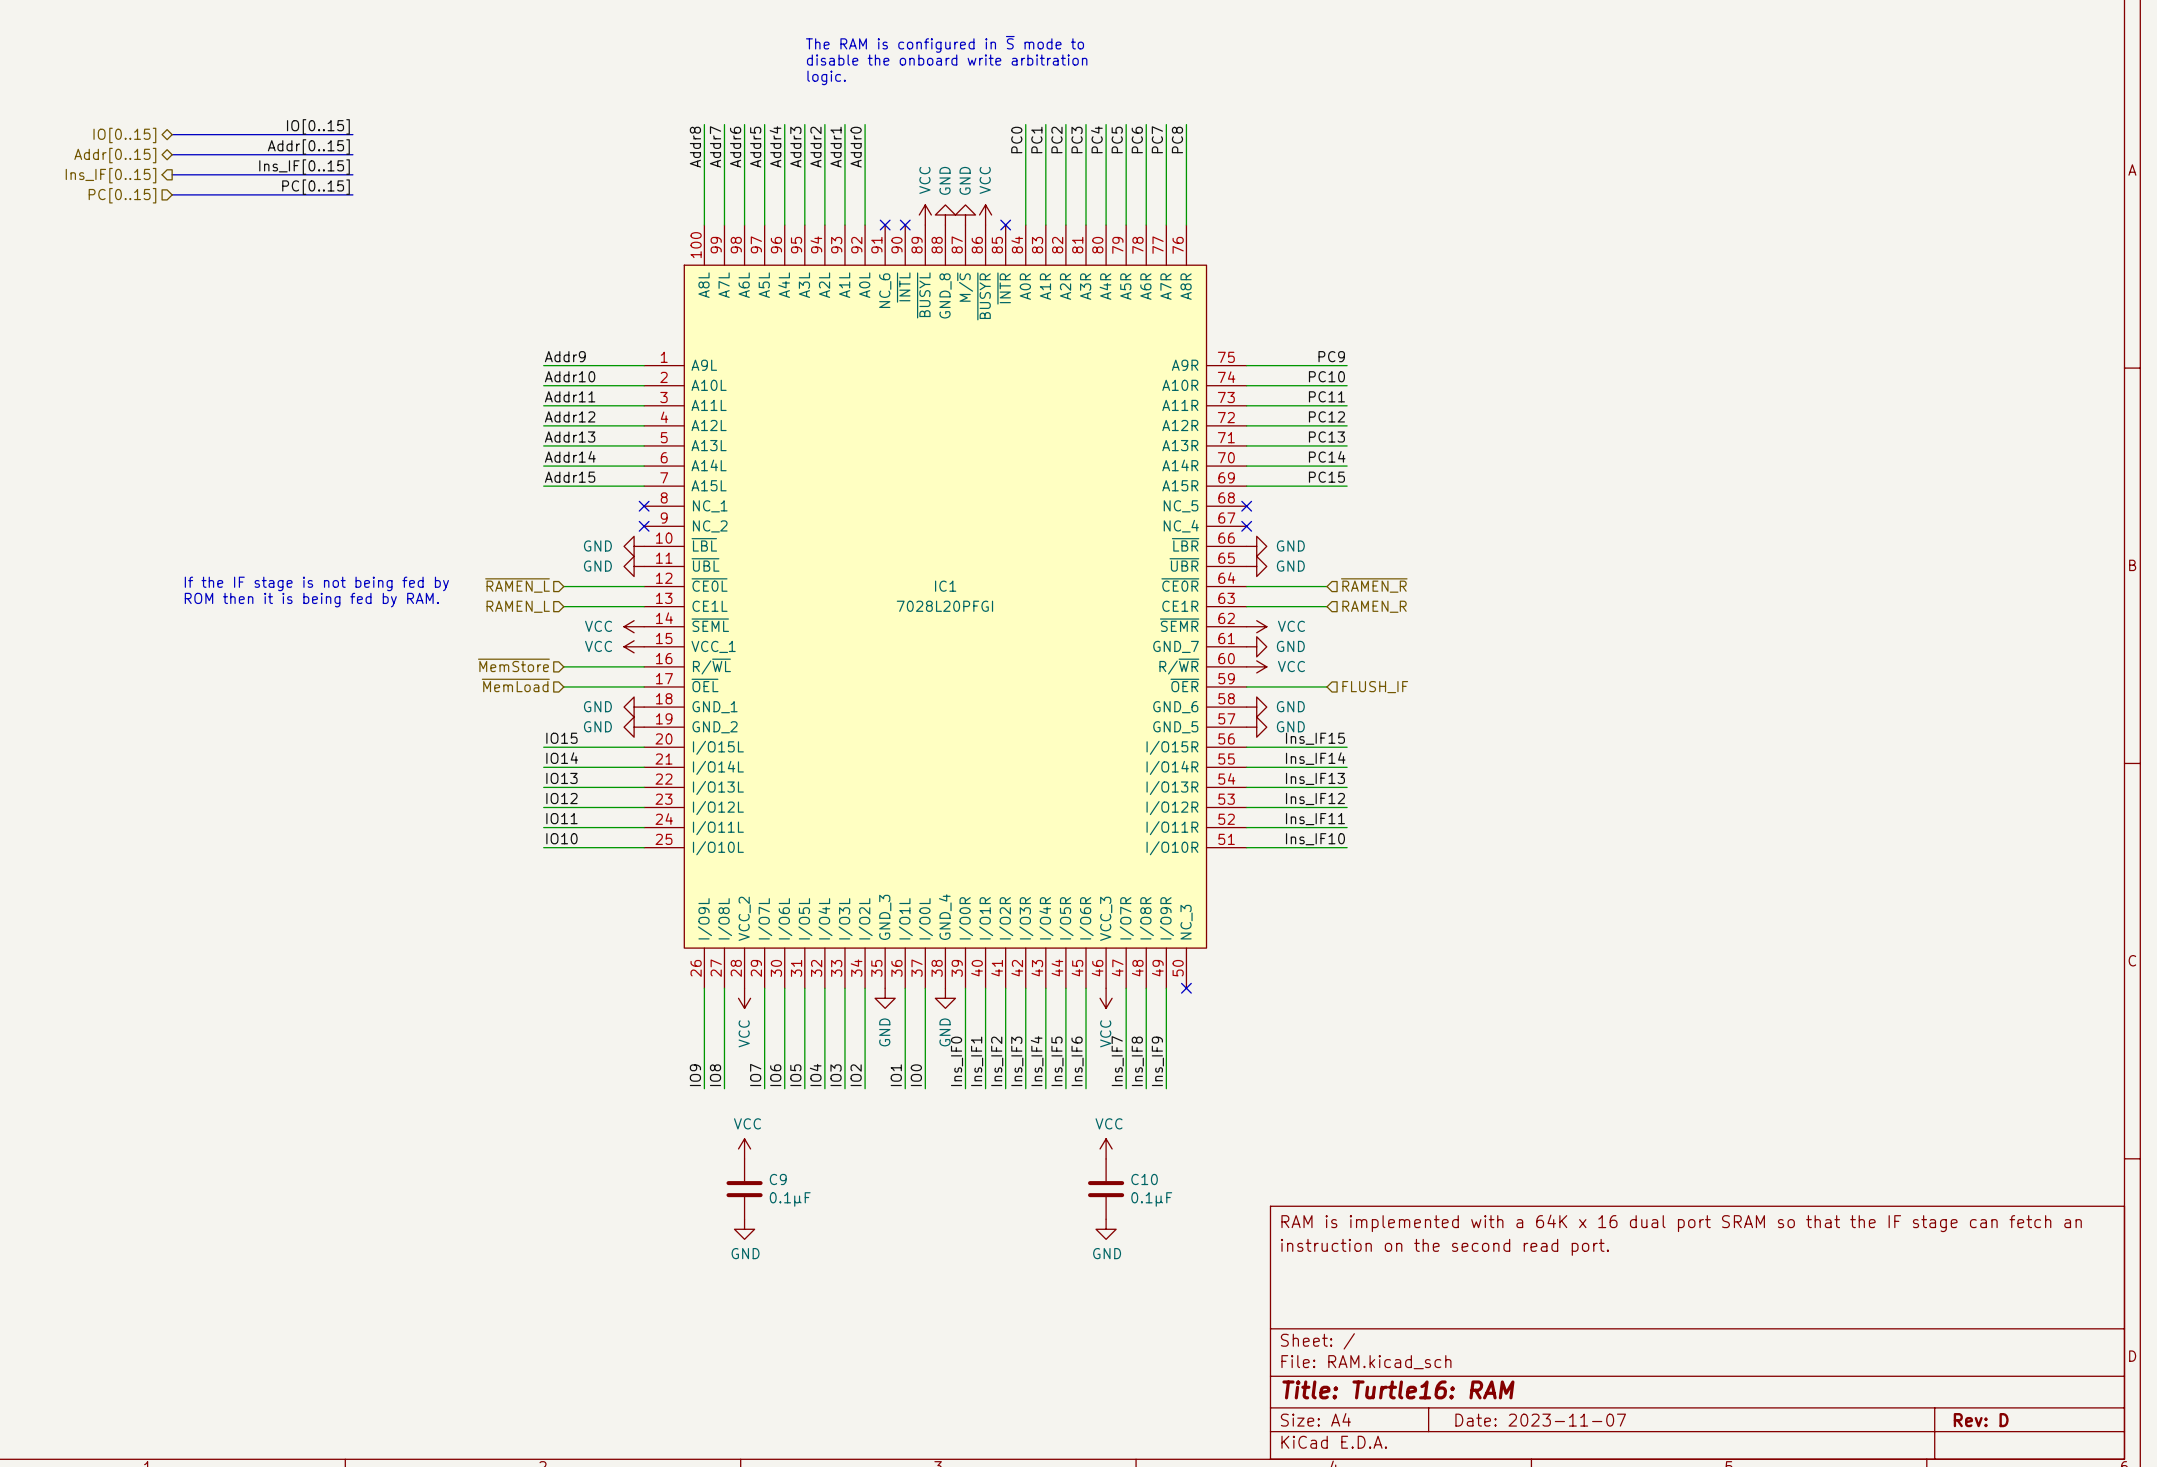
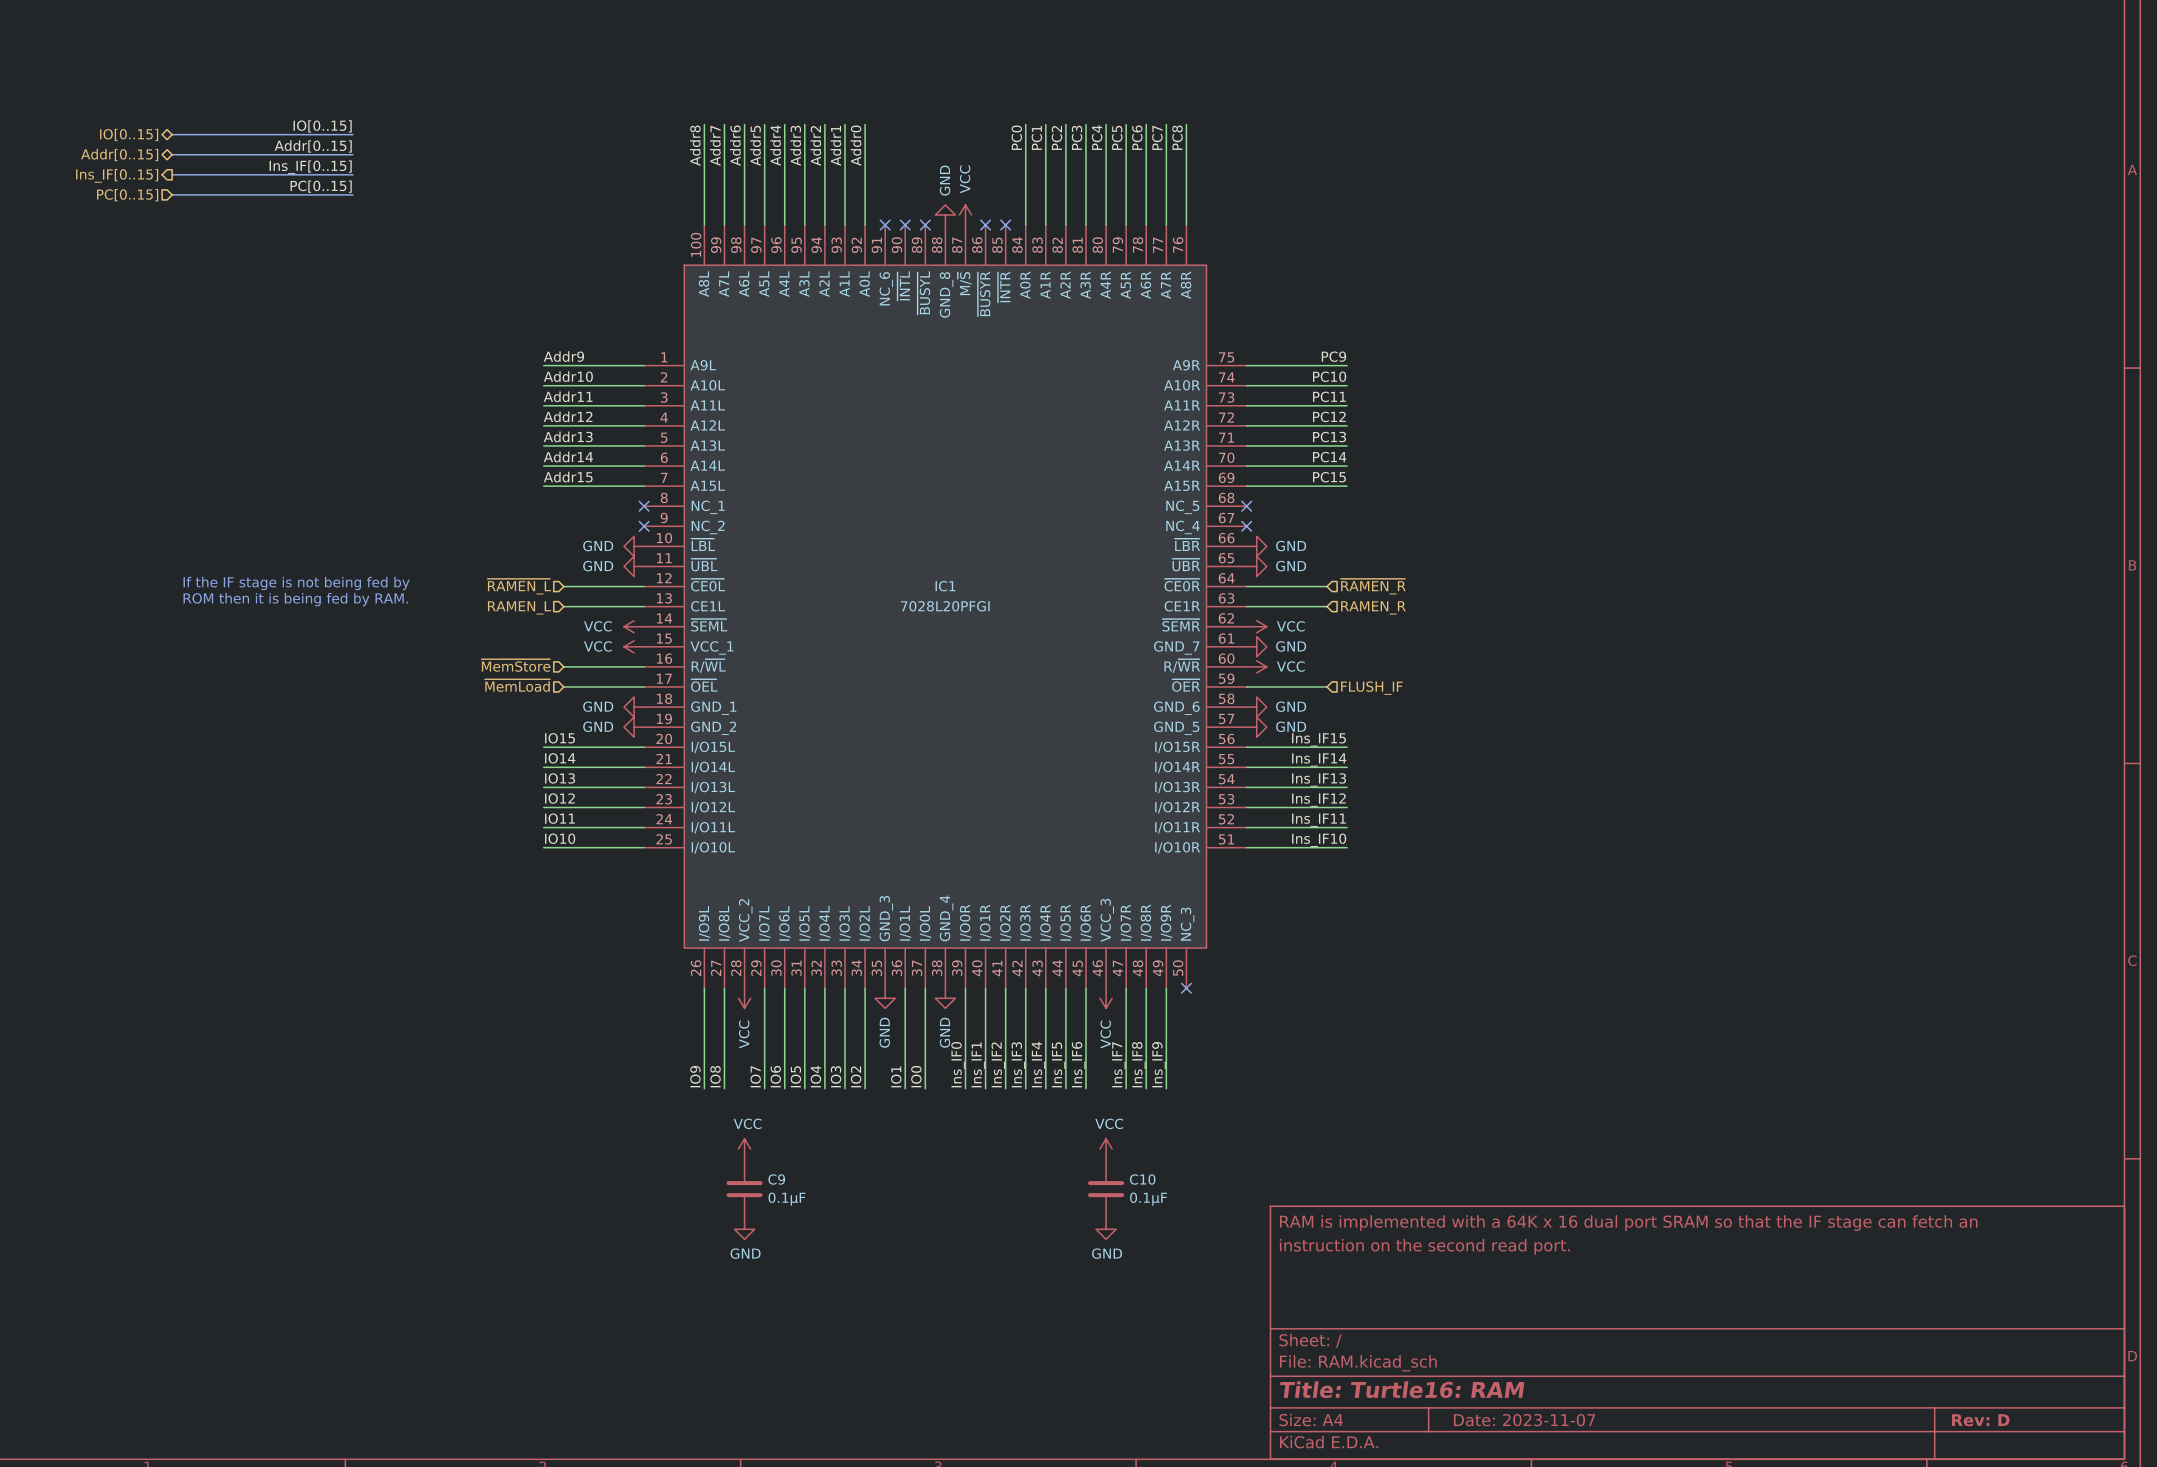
text: The RAM is configured in ~{S} mode to (945, 44) -> none
text: disable the onboard write arbitration (947, 60) -> none
text: logic. (826, 77) -> none
power symbol: VCC (925, 214) -> none
power symbol: GND (965, 214) -> VCC (965, 214)
power symbol: VCC (985, 214) -> none
no-connect mark: none -> (925, 225)
no-connect mark: none -> (985, 225)

